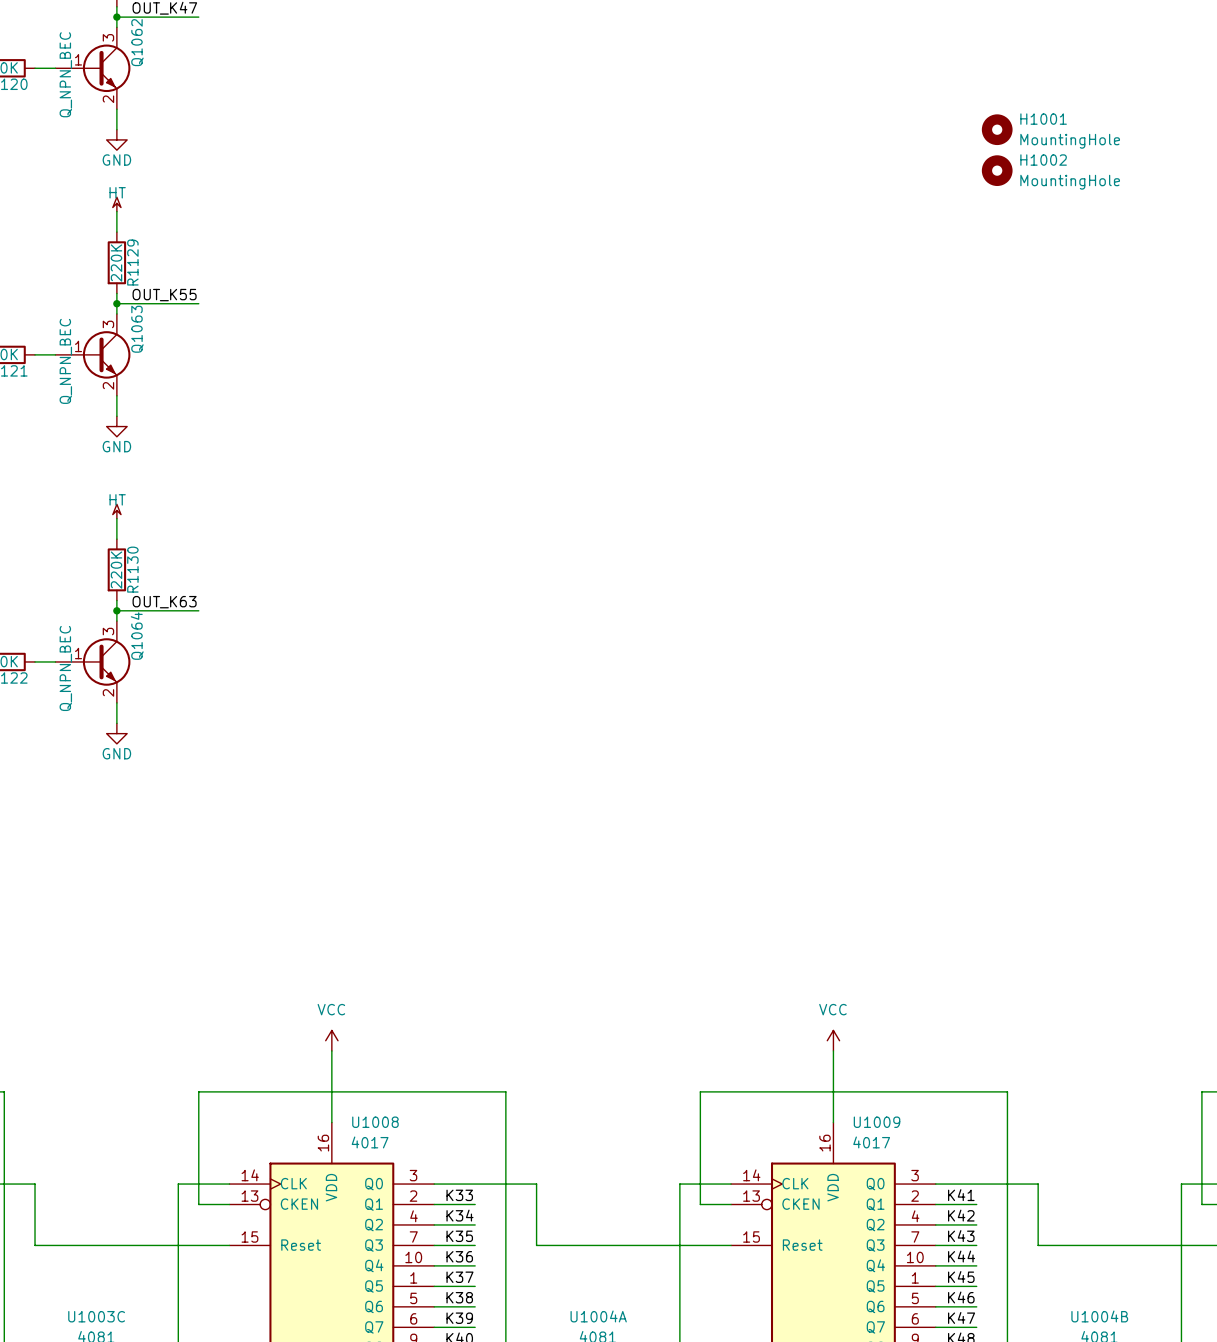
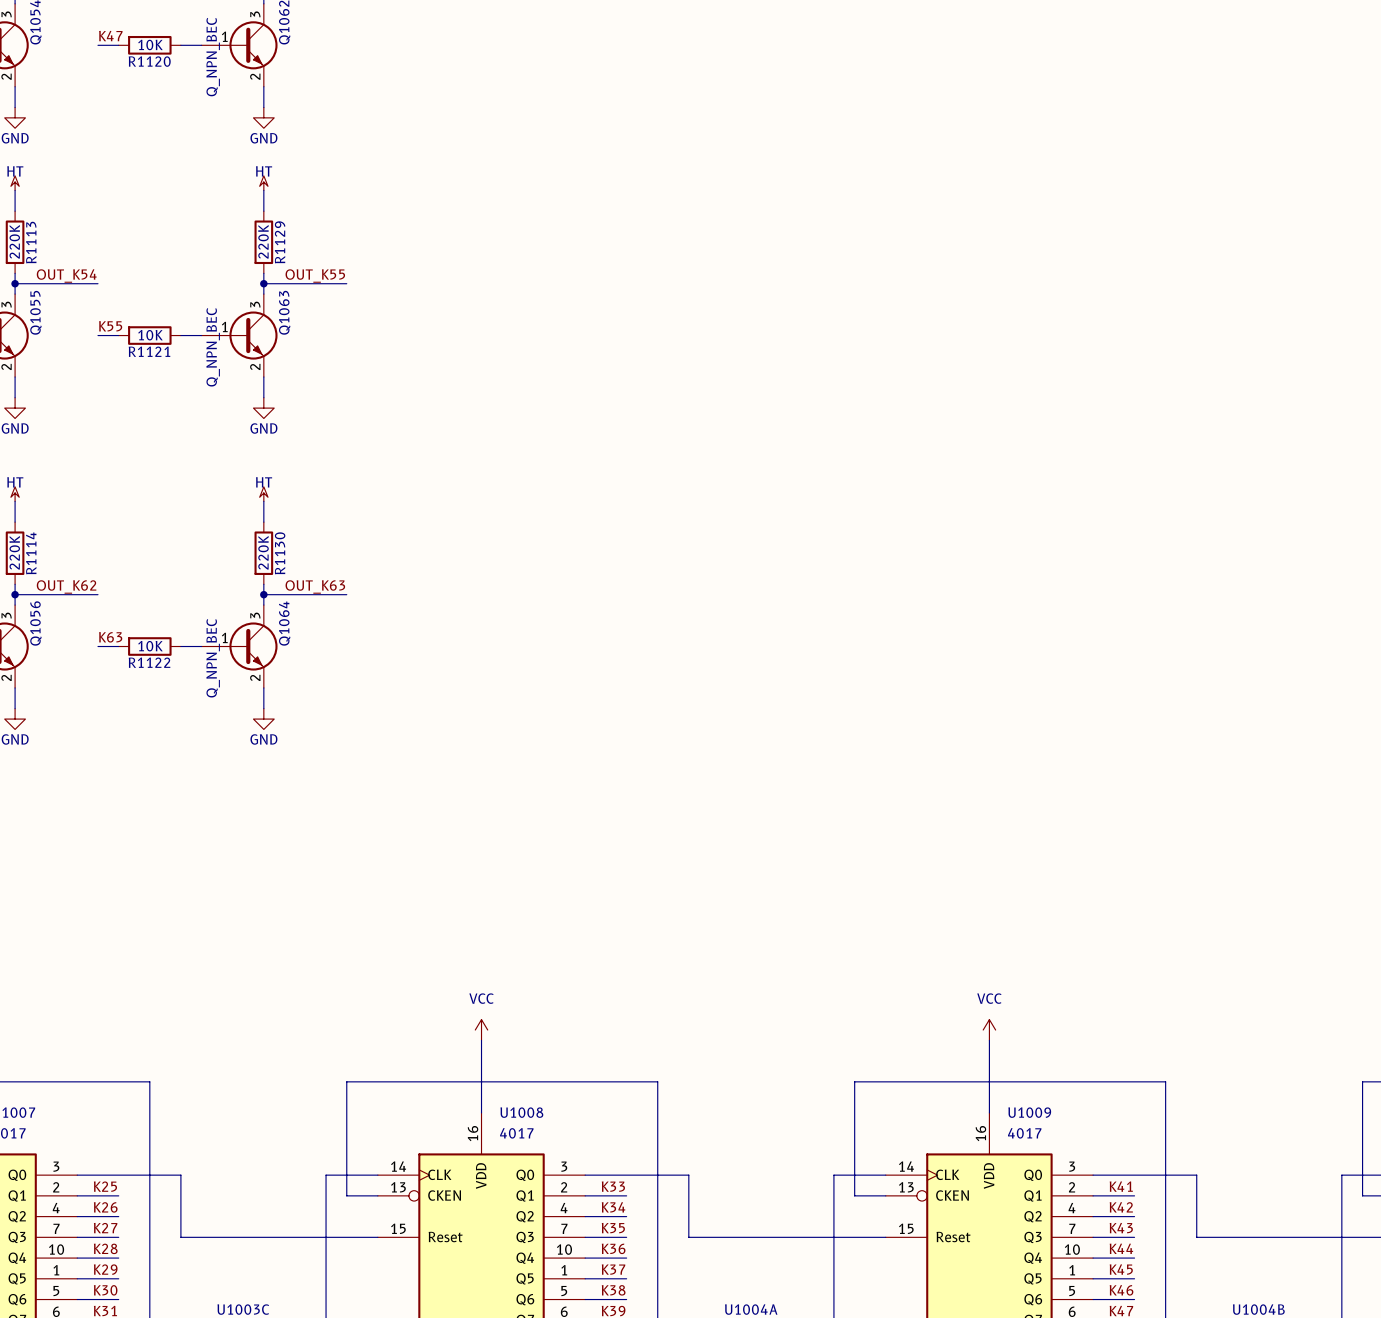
H1001: MountingHole (997, 129) -> none
H1002: MountingHole (997, 170) -> none

